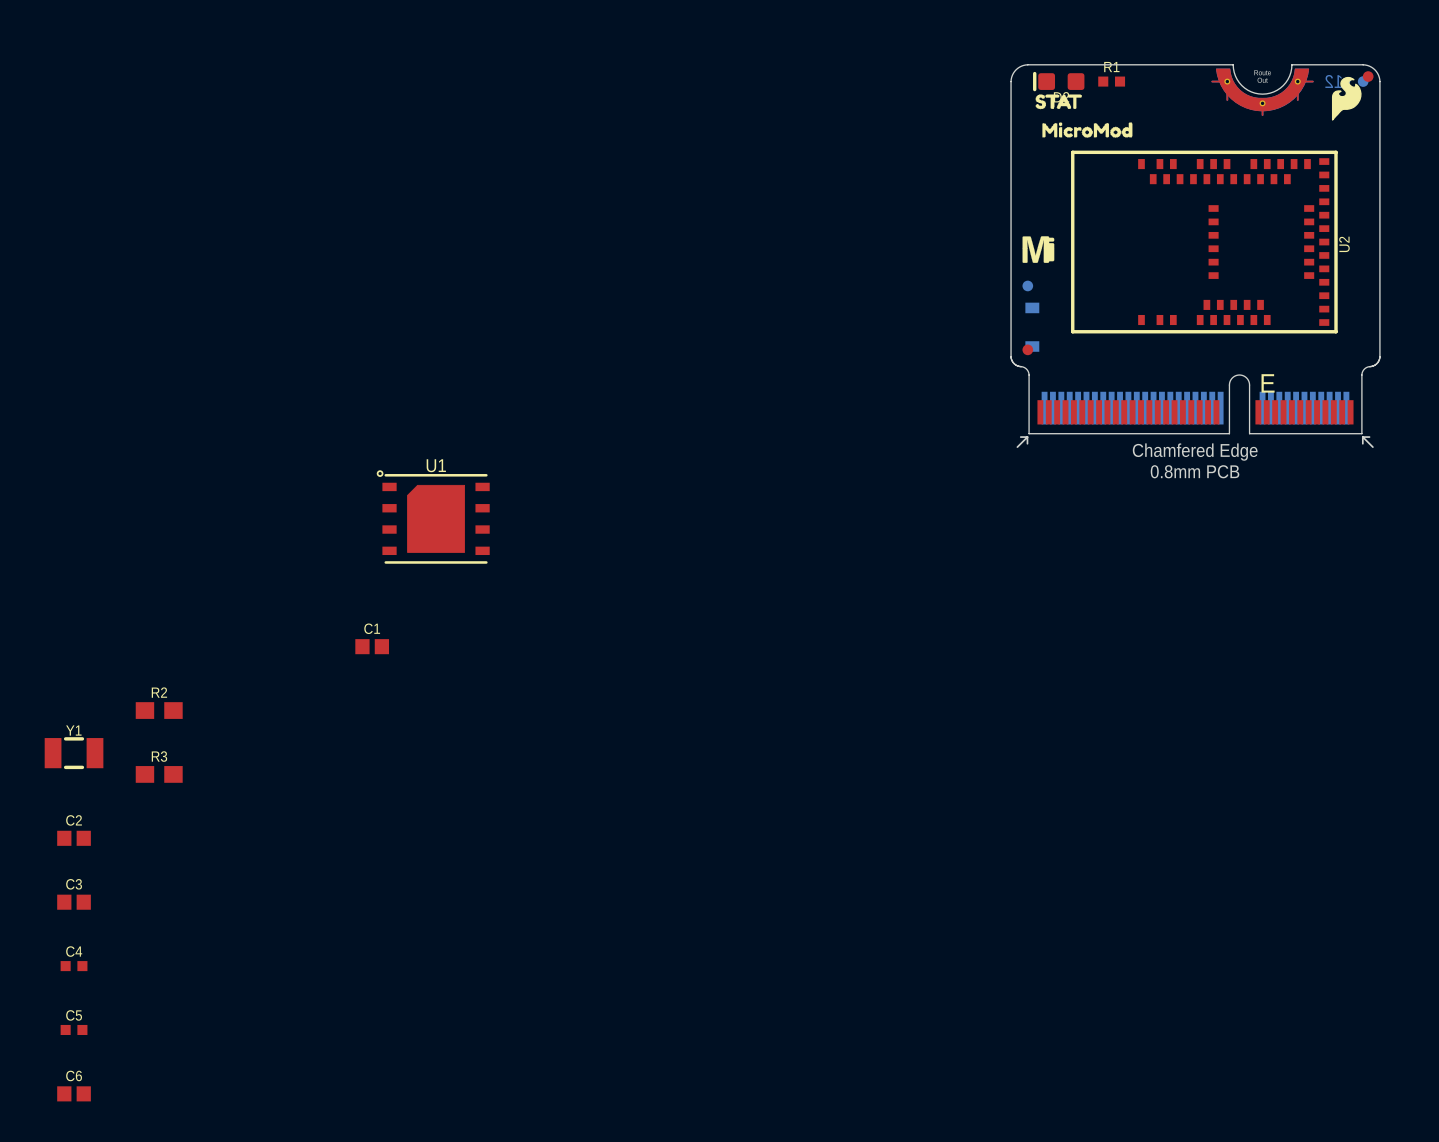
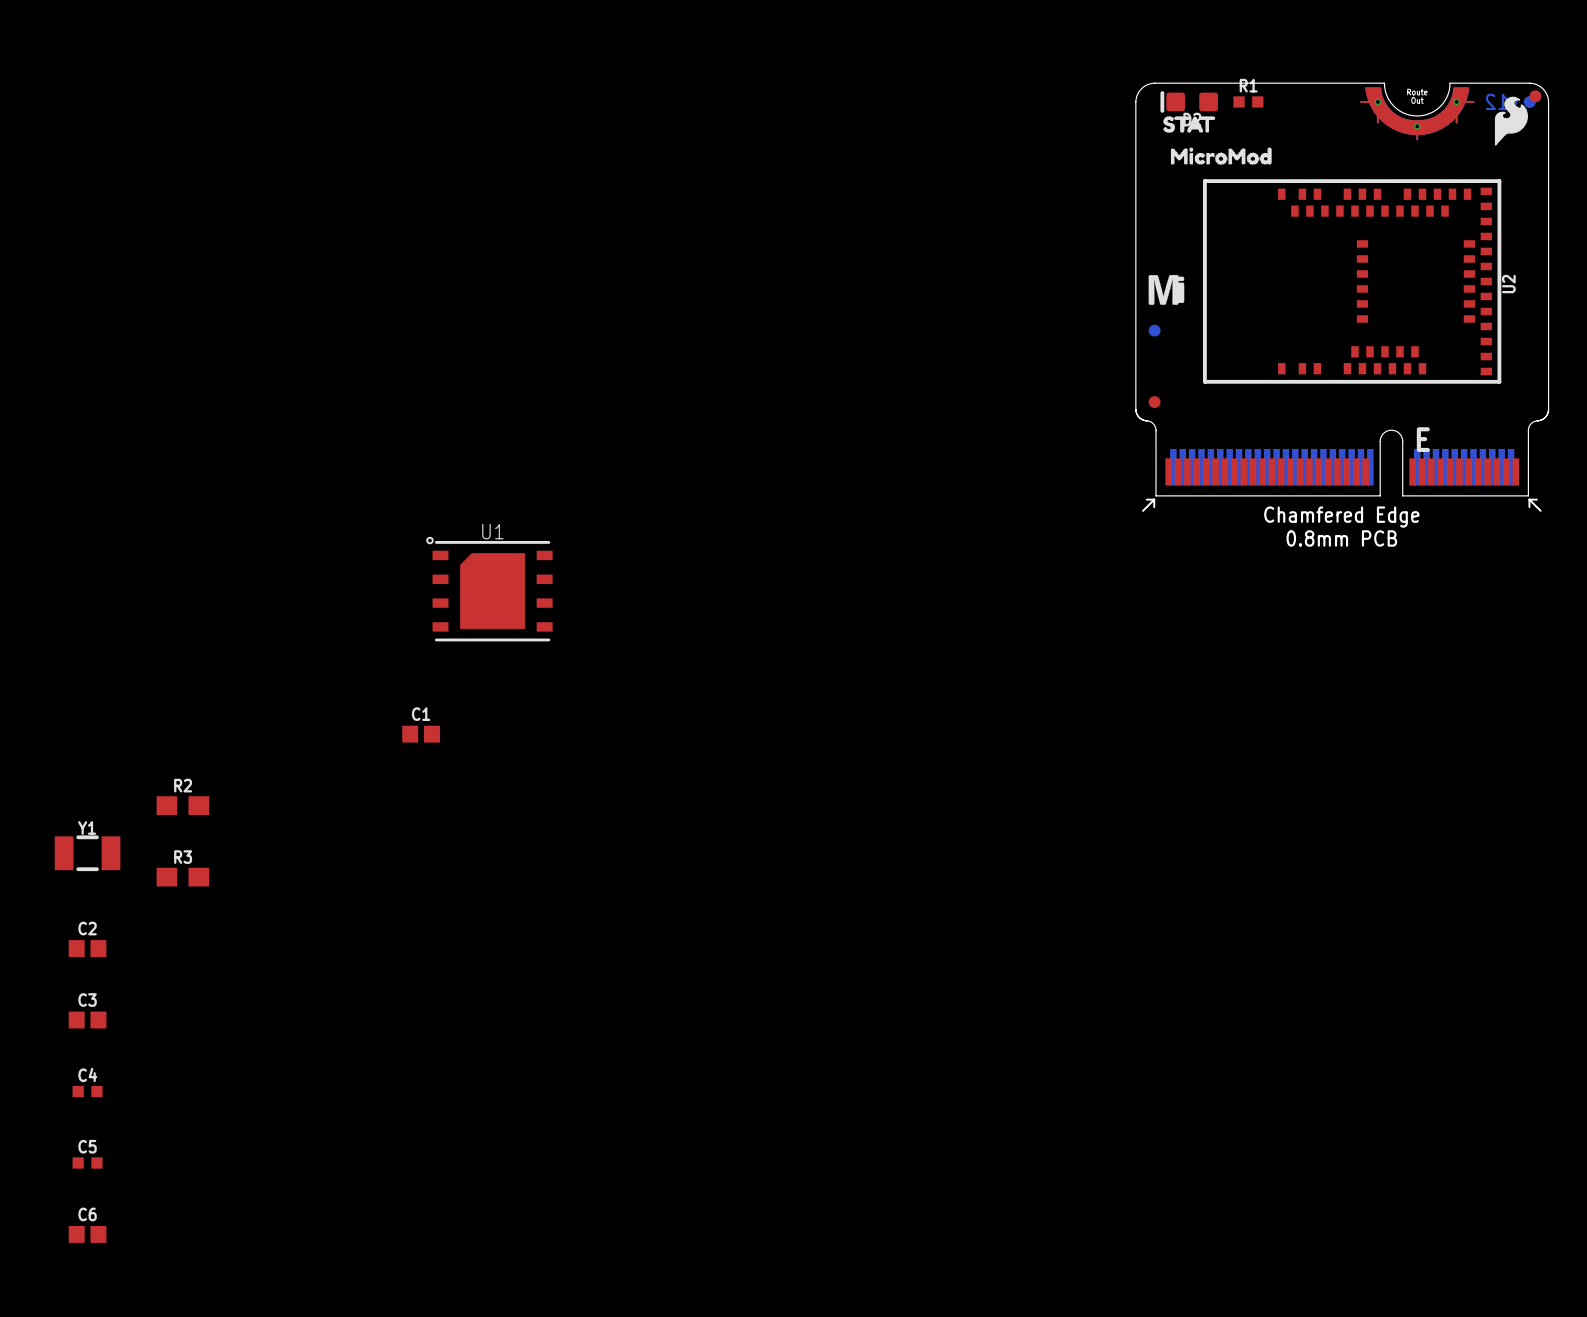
part: (1032, 327) -> none

